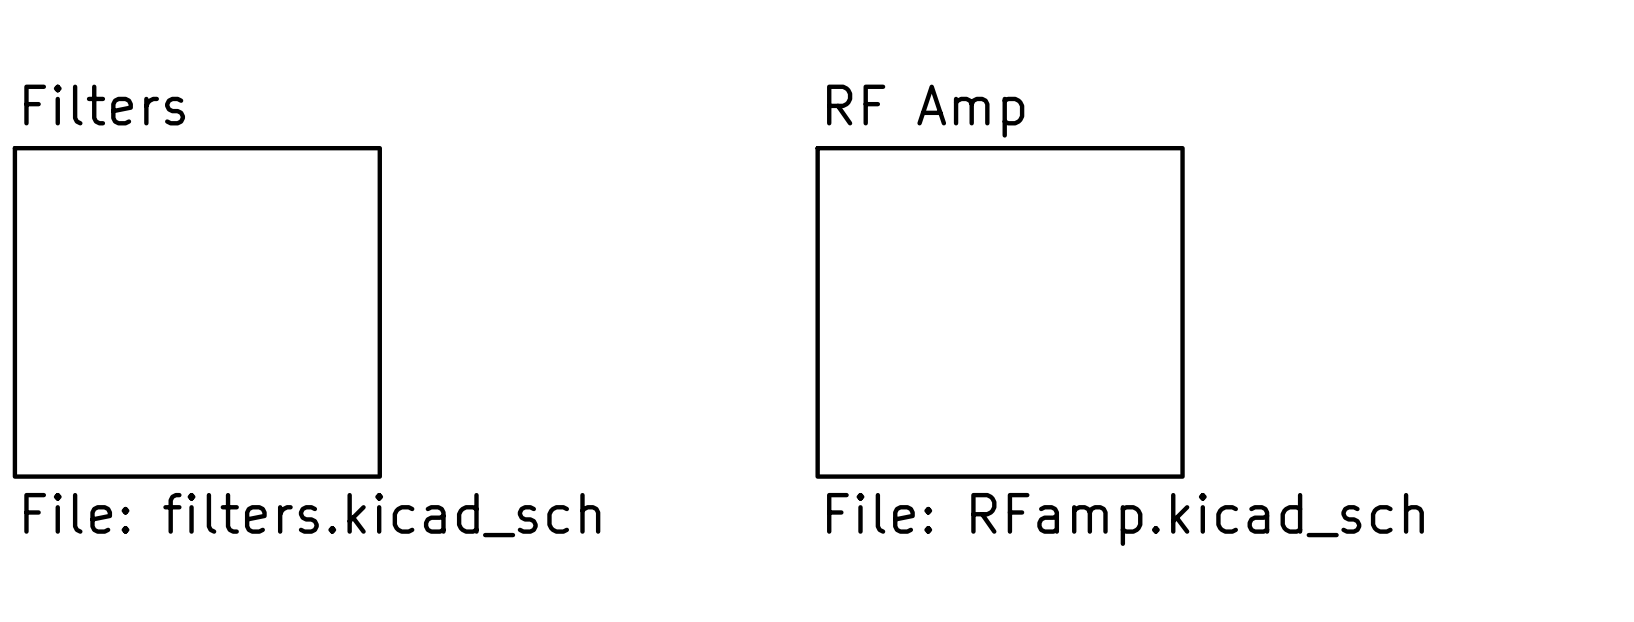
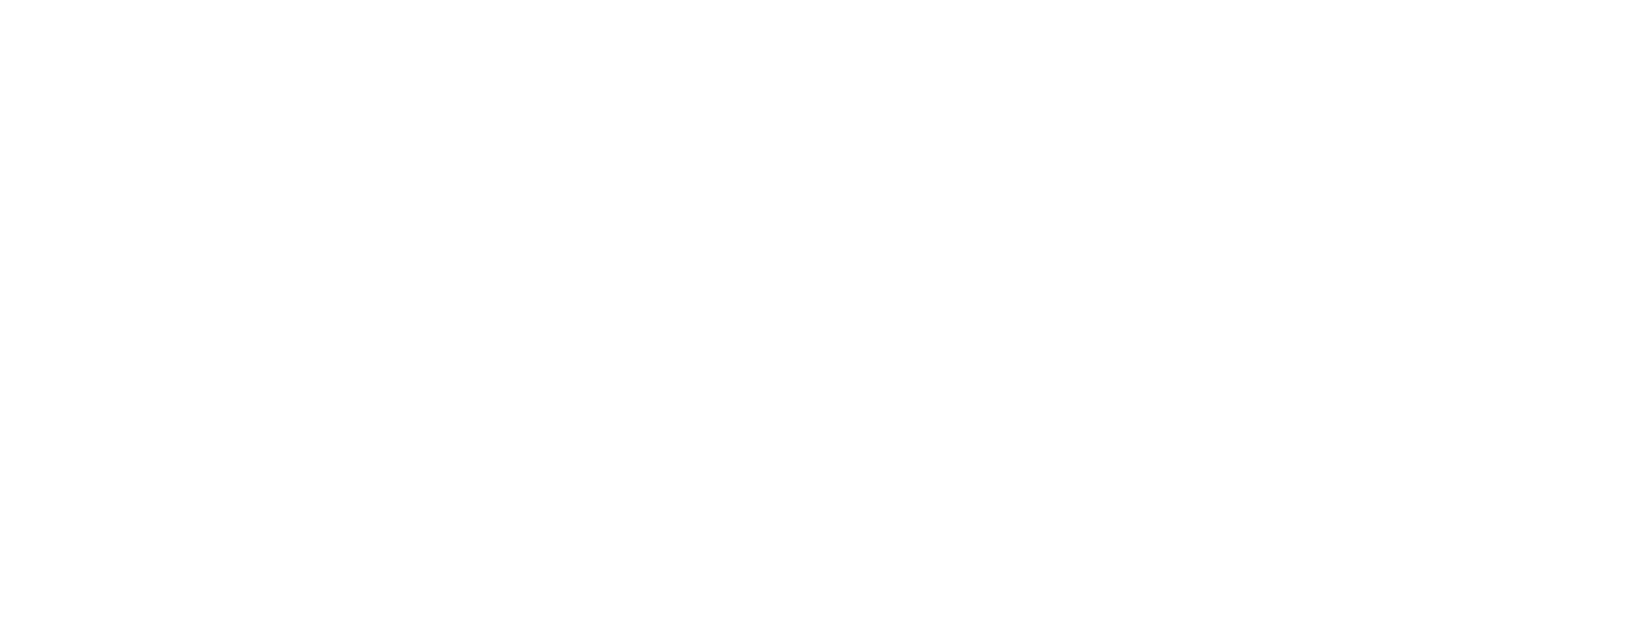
sheet Filters: File: filters.kicad_sch (197, 312) -> none
sheet RF Amp: File: RFamp.kicad_sch (1000, 312) -> none

